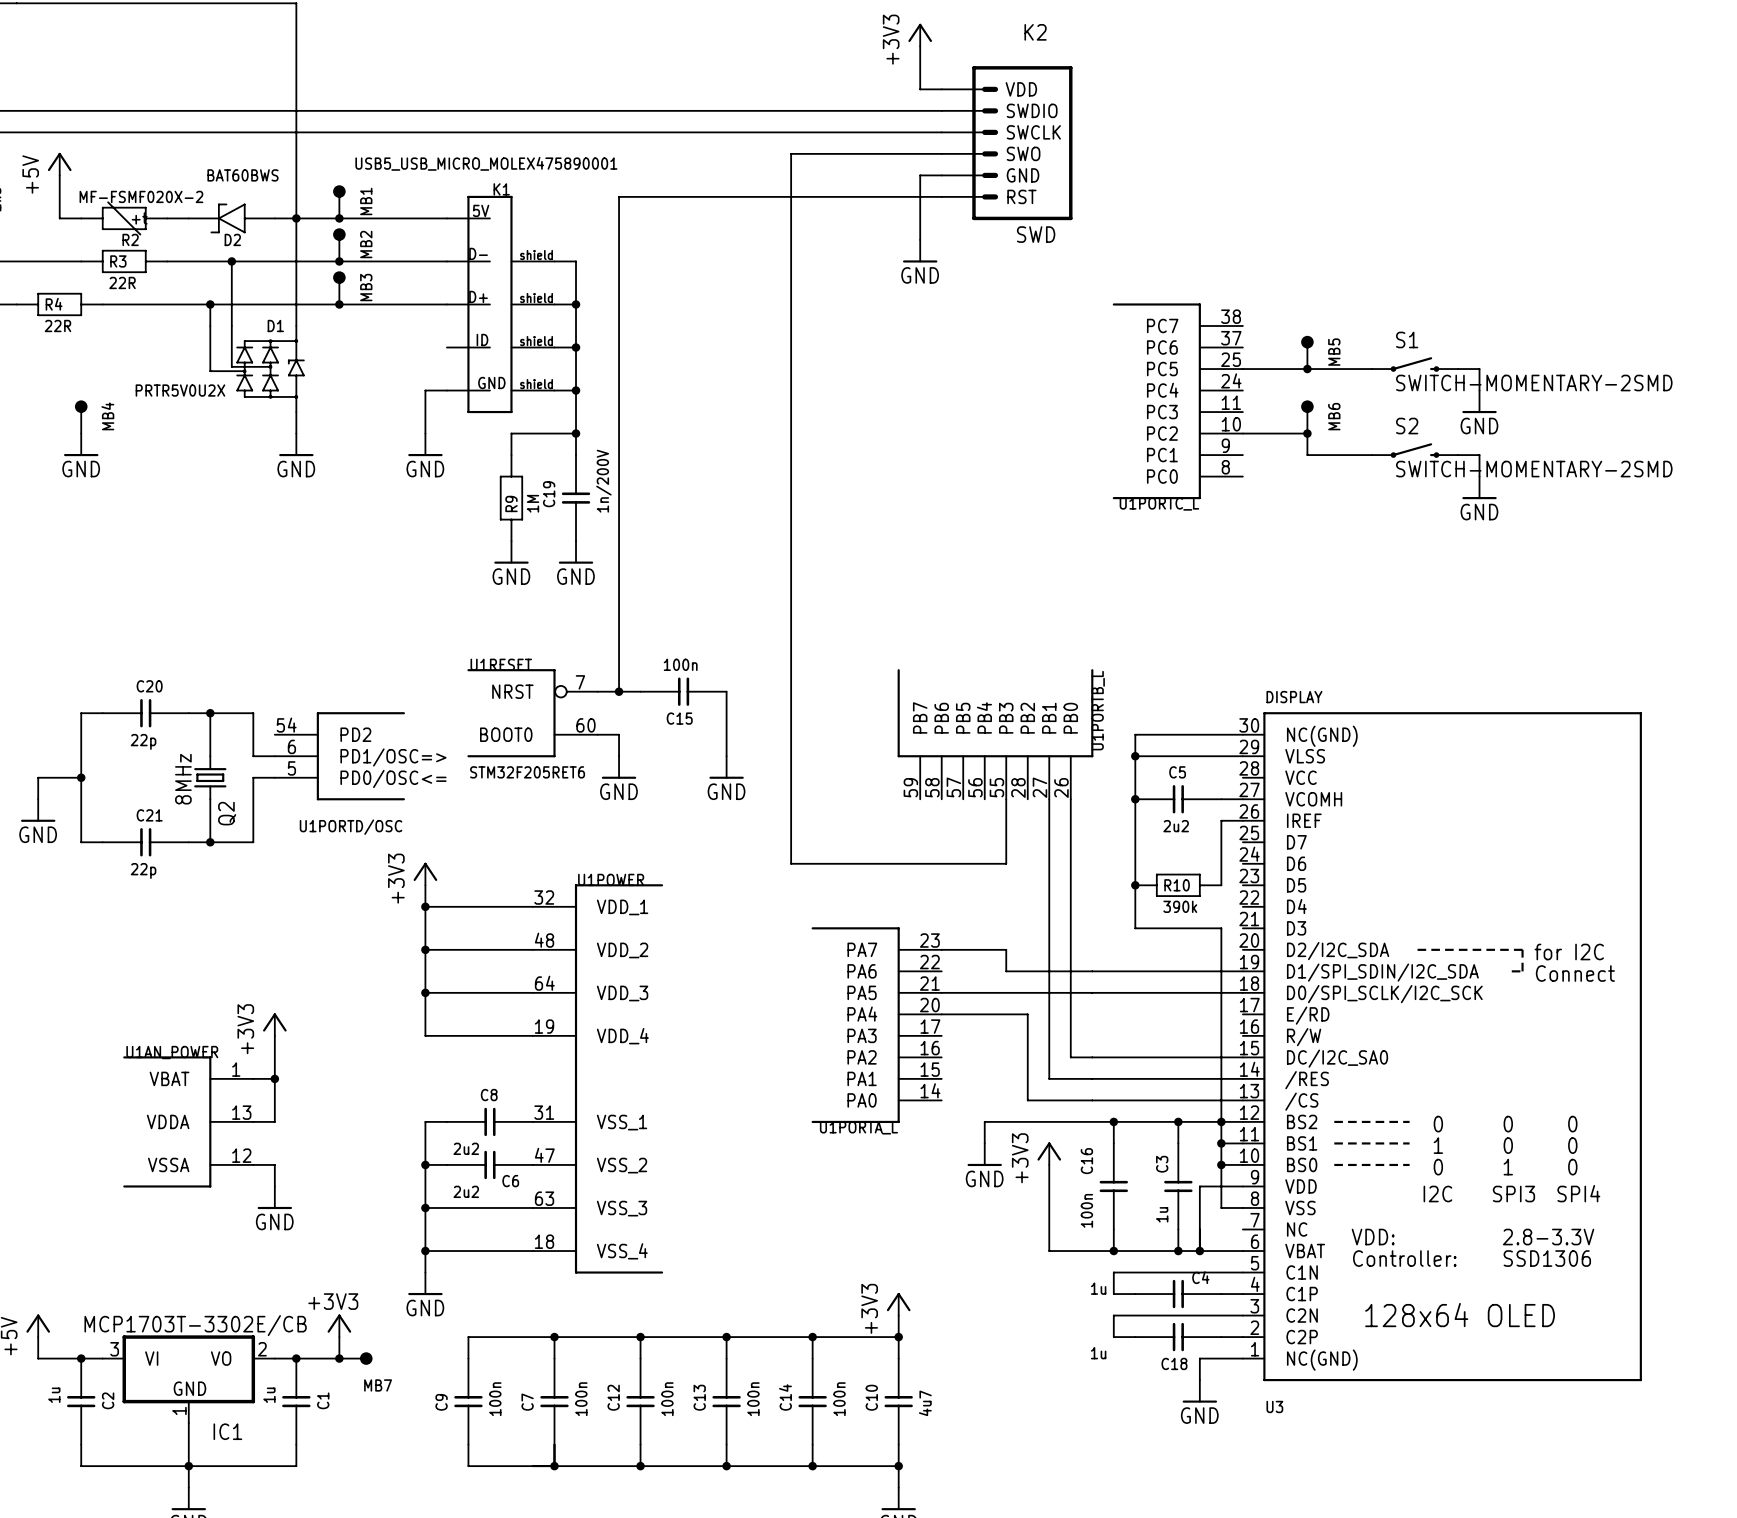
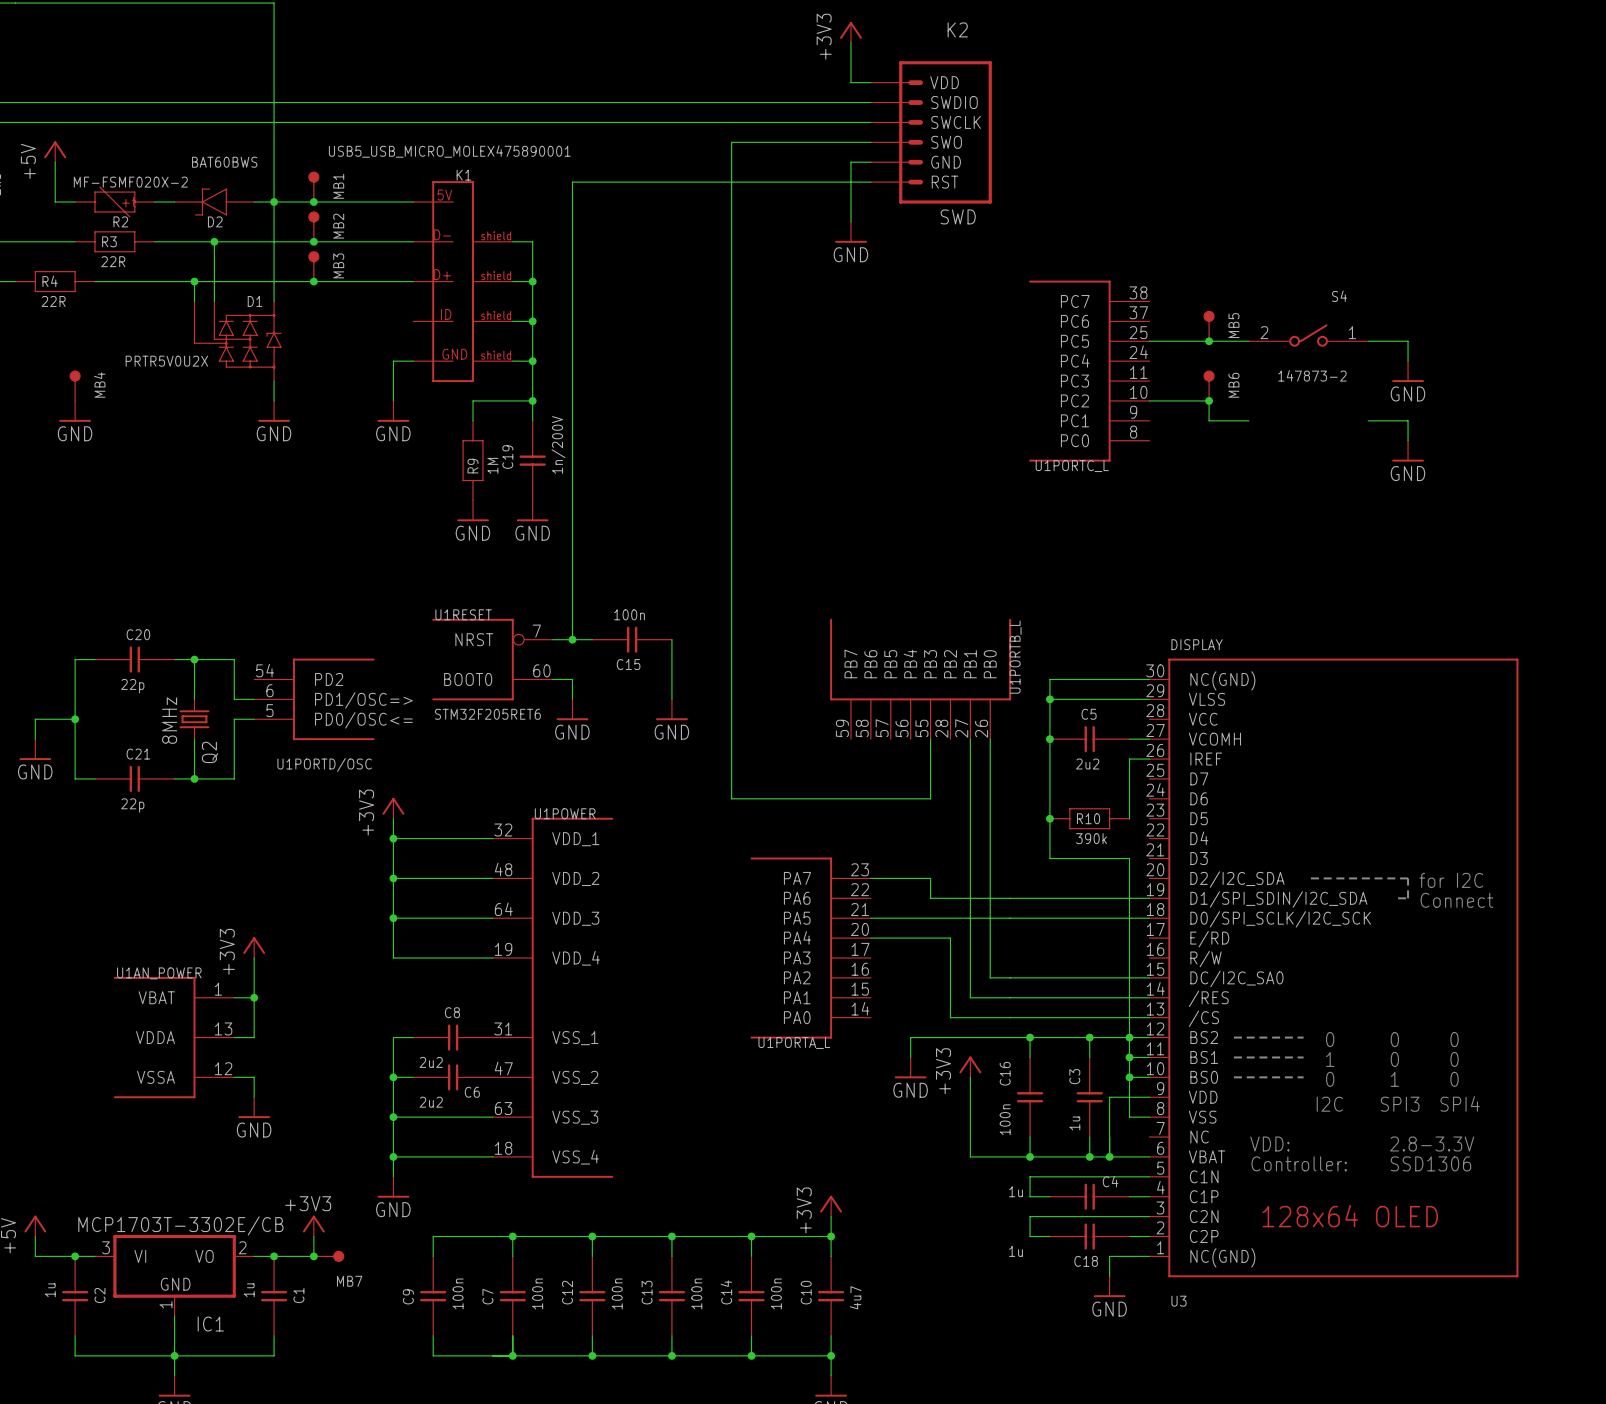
S4: none -> 147873-2 (1308, 335)
S1: SWITCH-MOMENTARY-2SMD (1414, 364) -> none
wire: (1458, 369) (1479, 369) (1479, 390) -> none
wire: none -> (1368, 341) (1408, 341) (1408, 361)
power symbol position: GND (1479, 401) -> GND (1408, 371)
S2: SWITCH-MOMENTARY-2SMD (1414, 450) -> none
wire: (1350, 455) (1371, 455) -> none
wire: (1458, 455) (1479, 455) (1479, 476) -> none
wire: none -> (1368, 420) (1408, 420) (1408, 440)
power symbol position: GND (1479, 487) -> GND (1408, 451)

